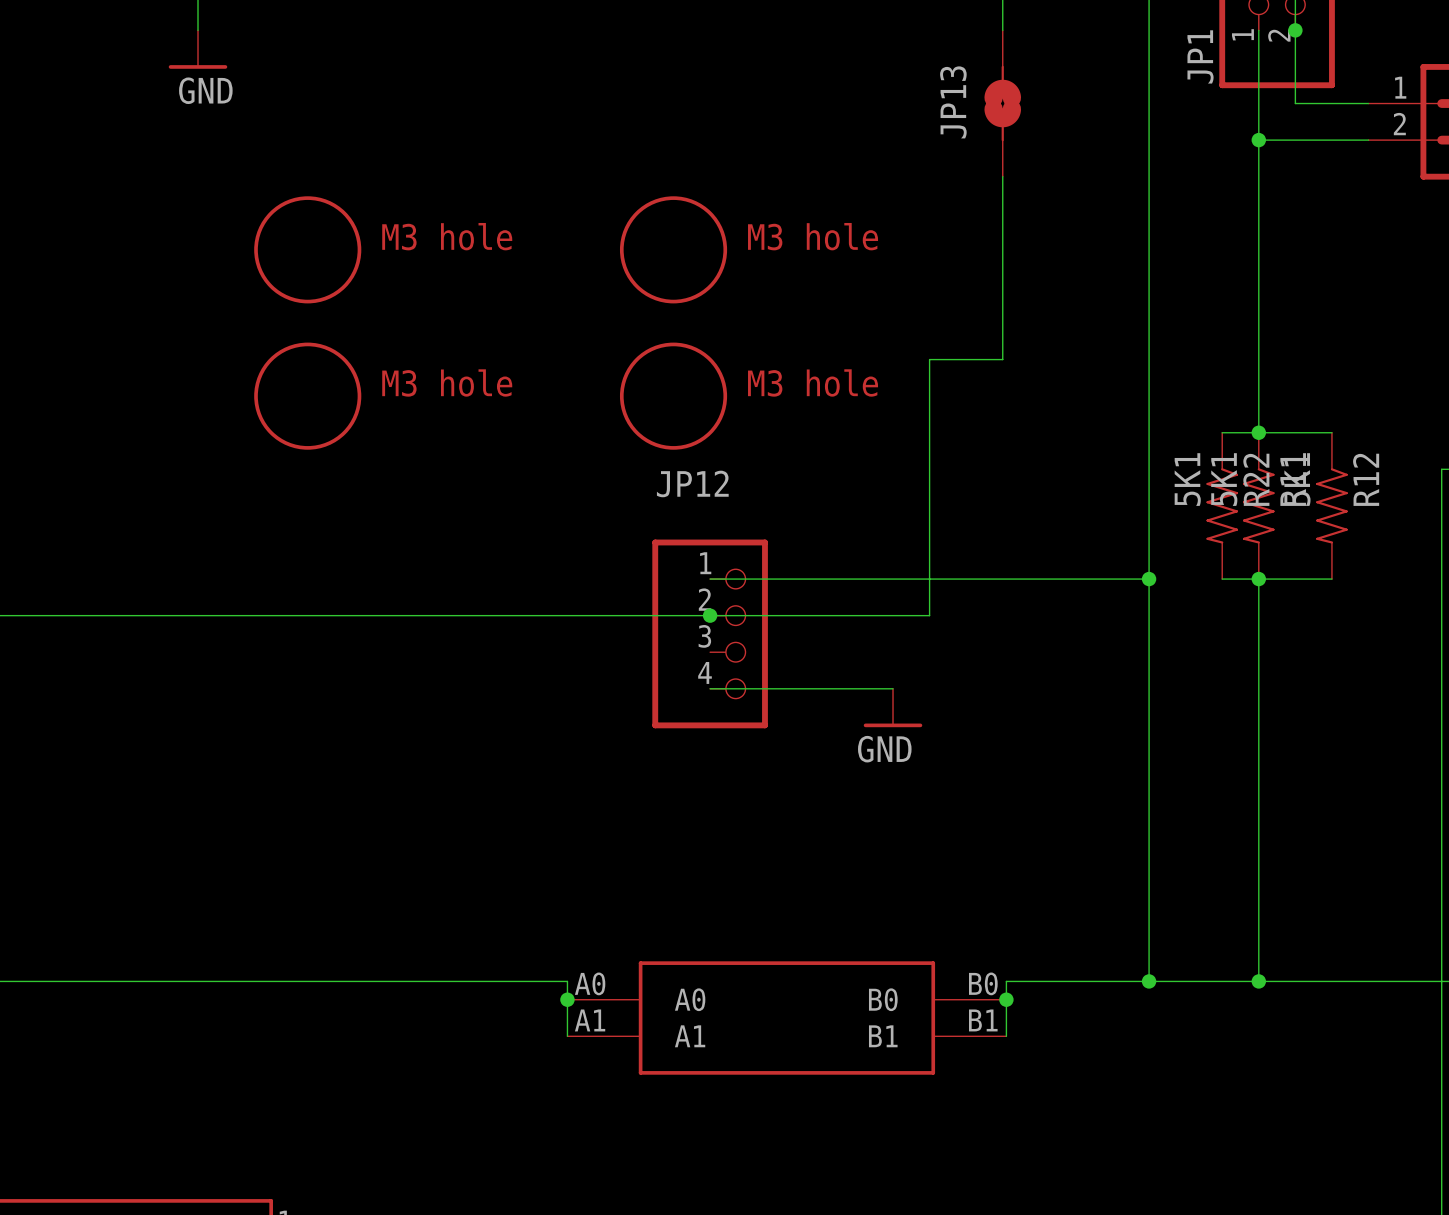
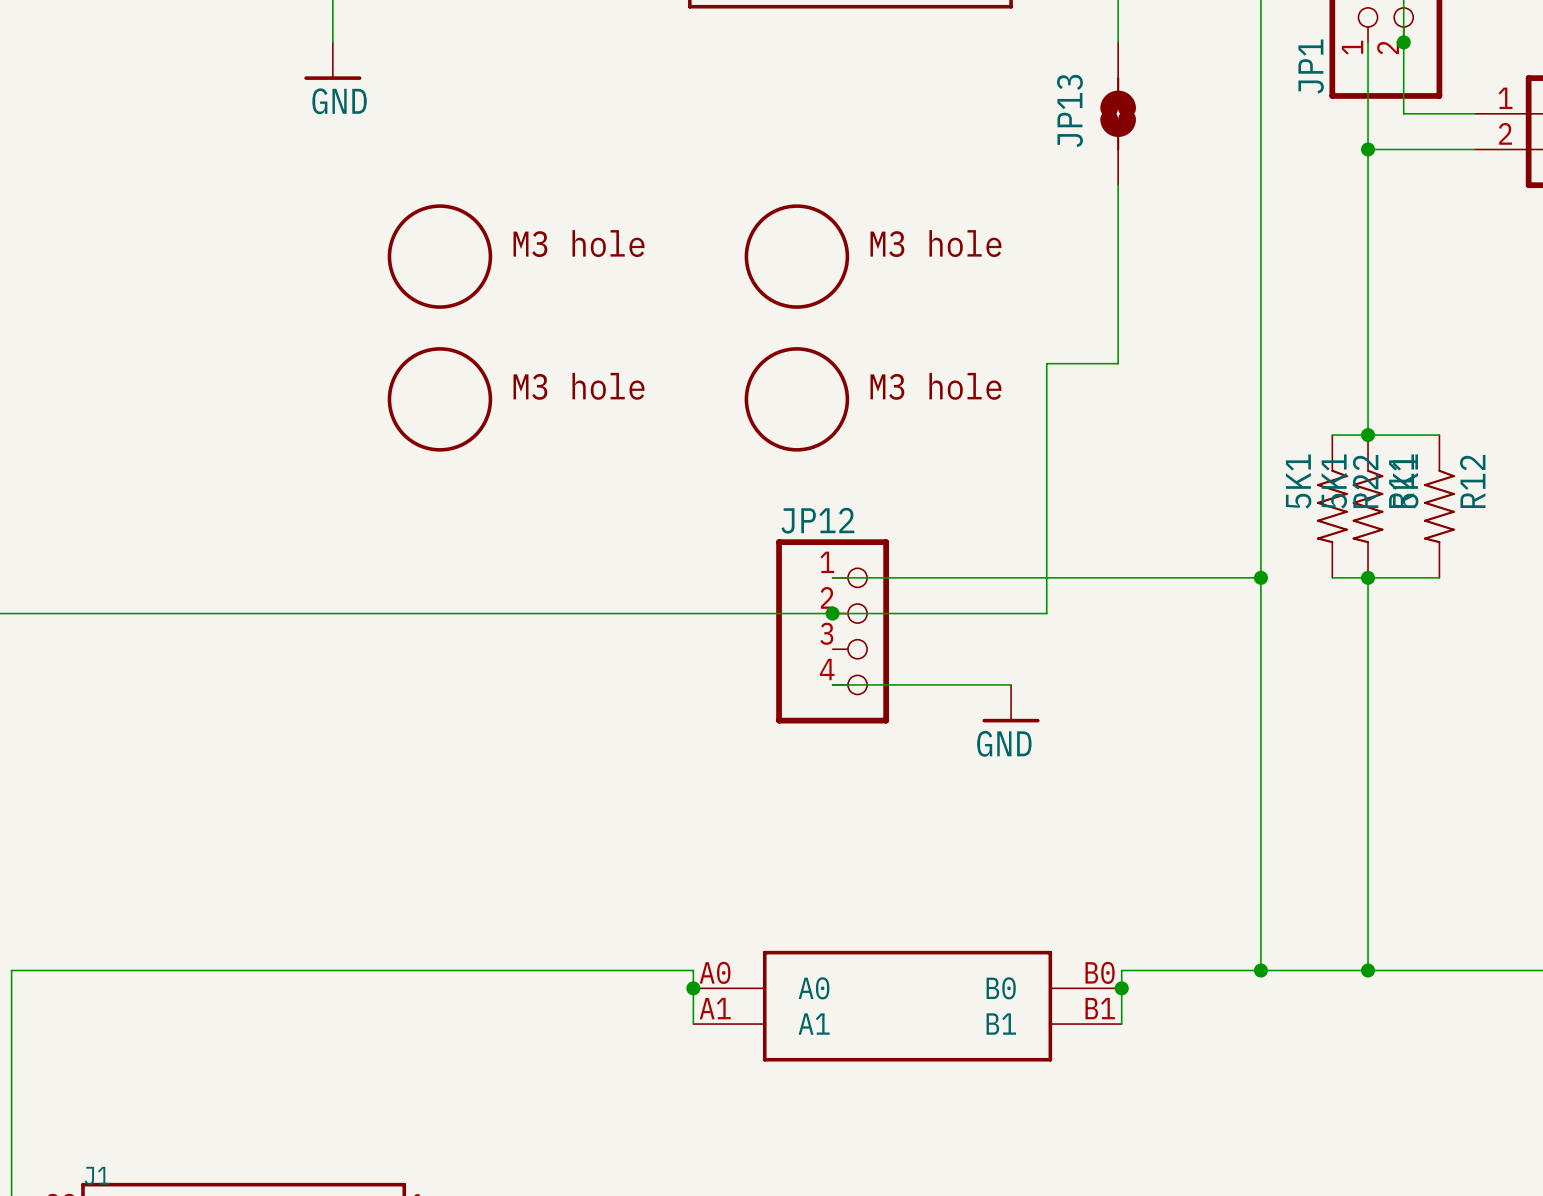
JP12 name position: JP12 (692, 483) -> JP12 (817, 520)

